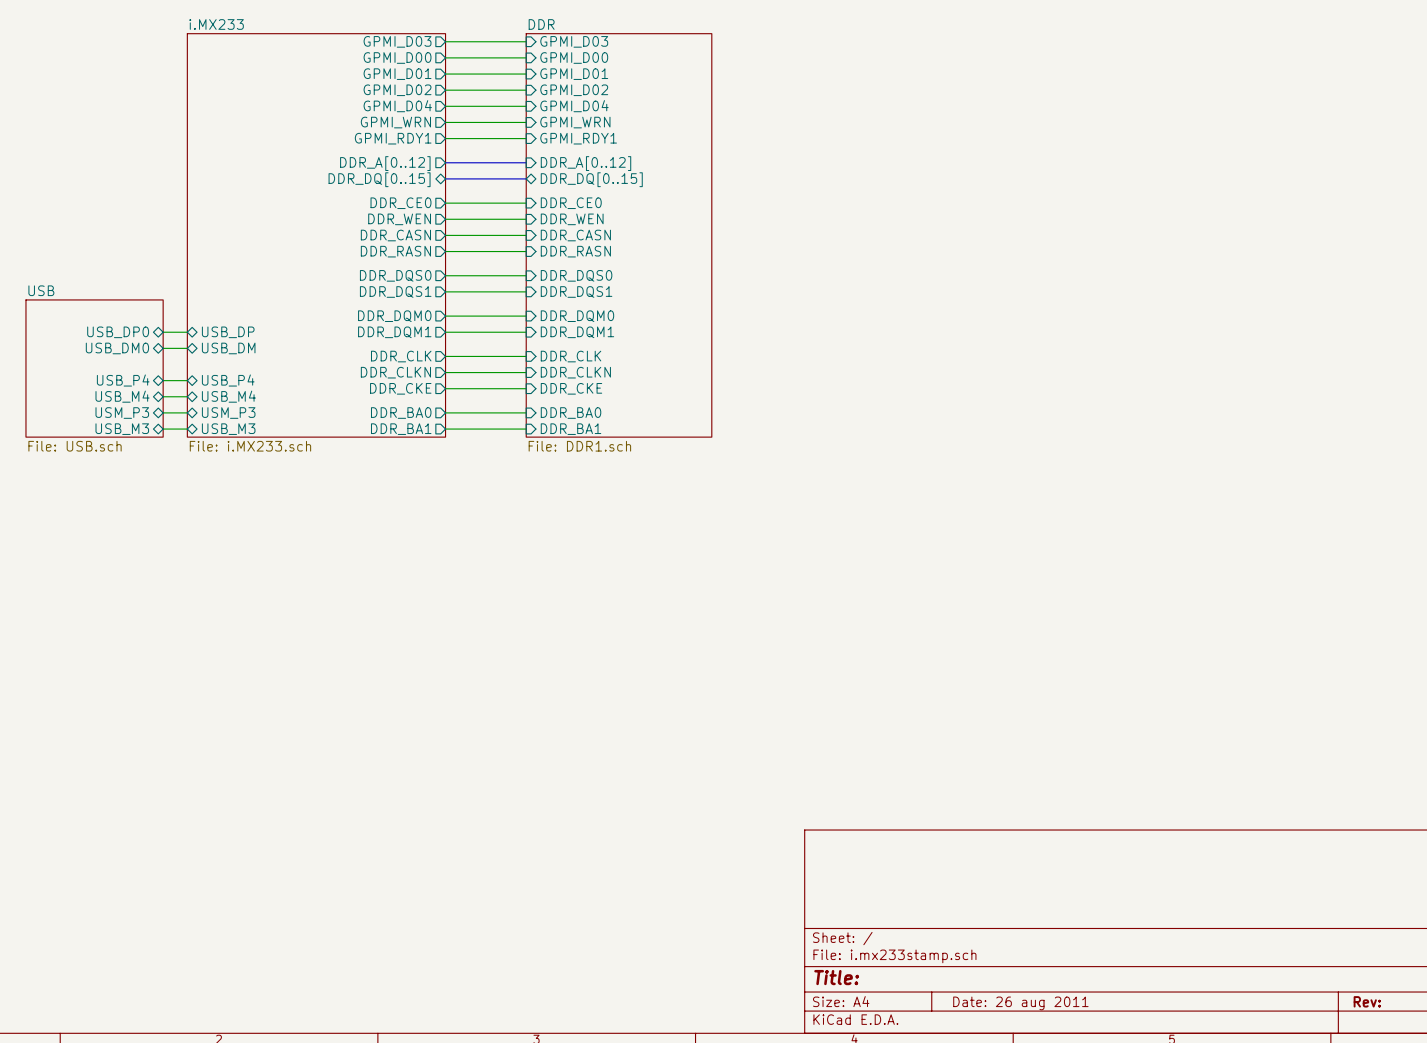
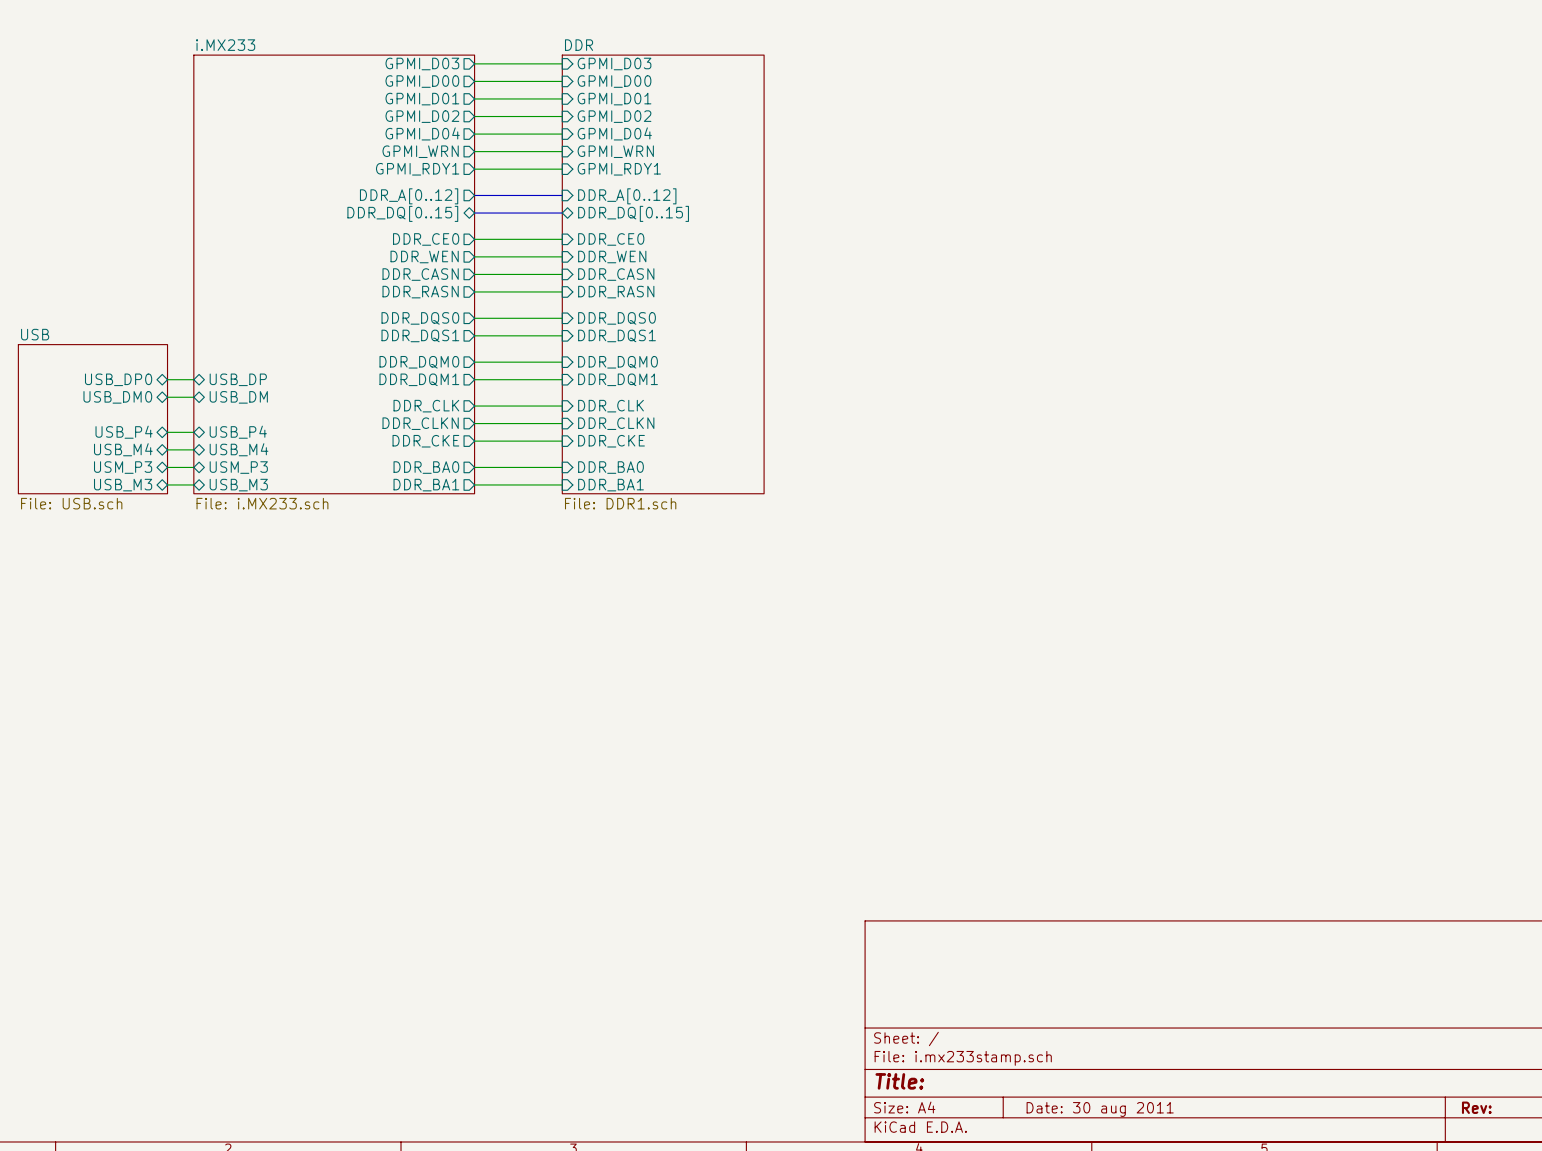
title block: Date: 26 aug 2011 (1020, 1003) -> Date: 30 aug 2011 (1100, 1109)

